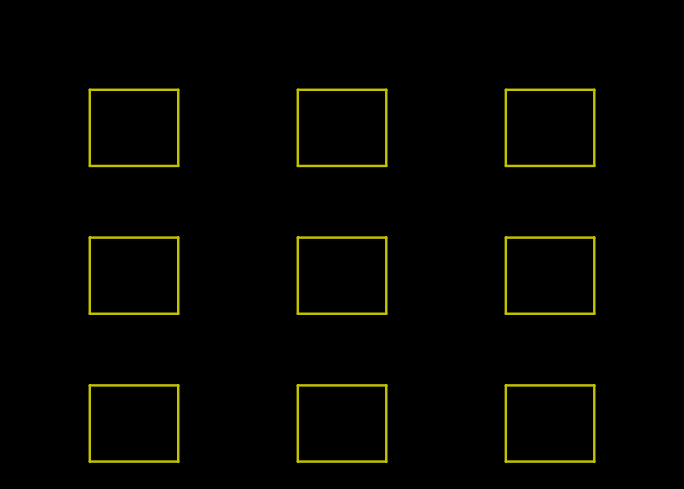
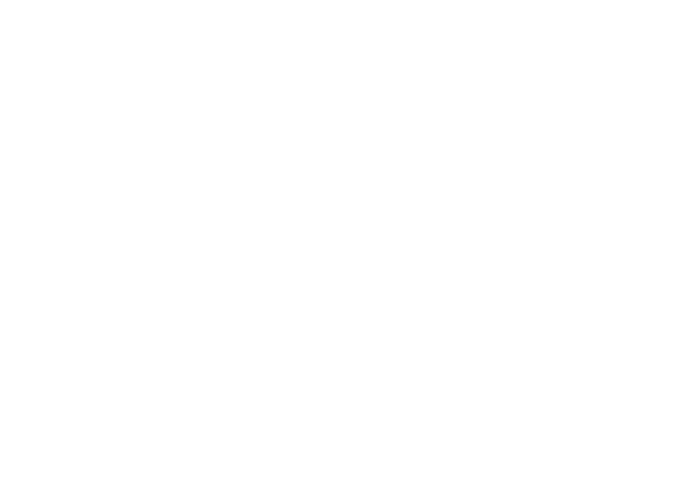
part: (134, 127) -> none
part: (342, 127) -> none
part: (550, 127) -> none
part: (134, 275) -> none
part: (342, 275) -> none
part: (550, 275) -> none
part: (134, 423) -> none
part: (342, 423) -> none
part: (550, 423) -> none

